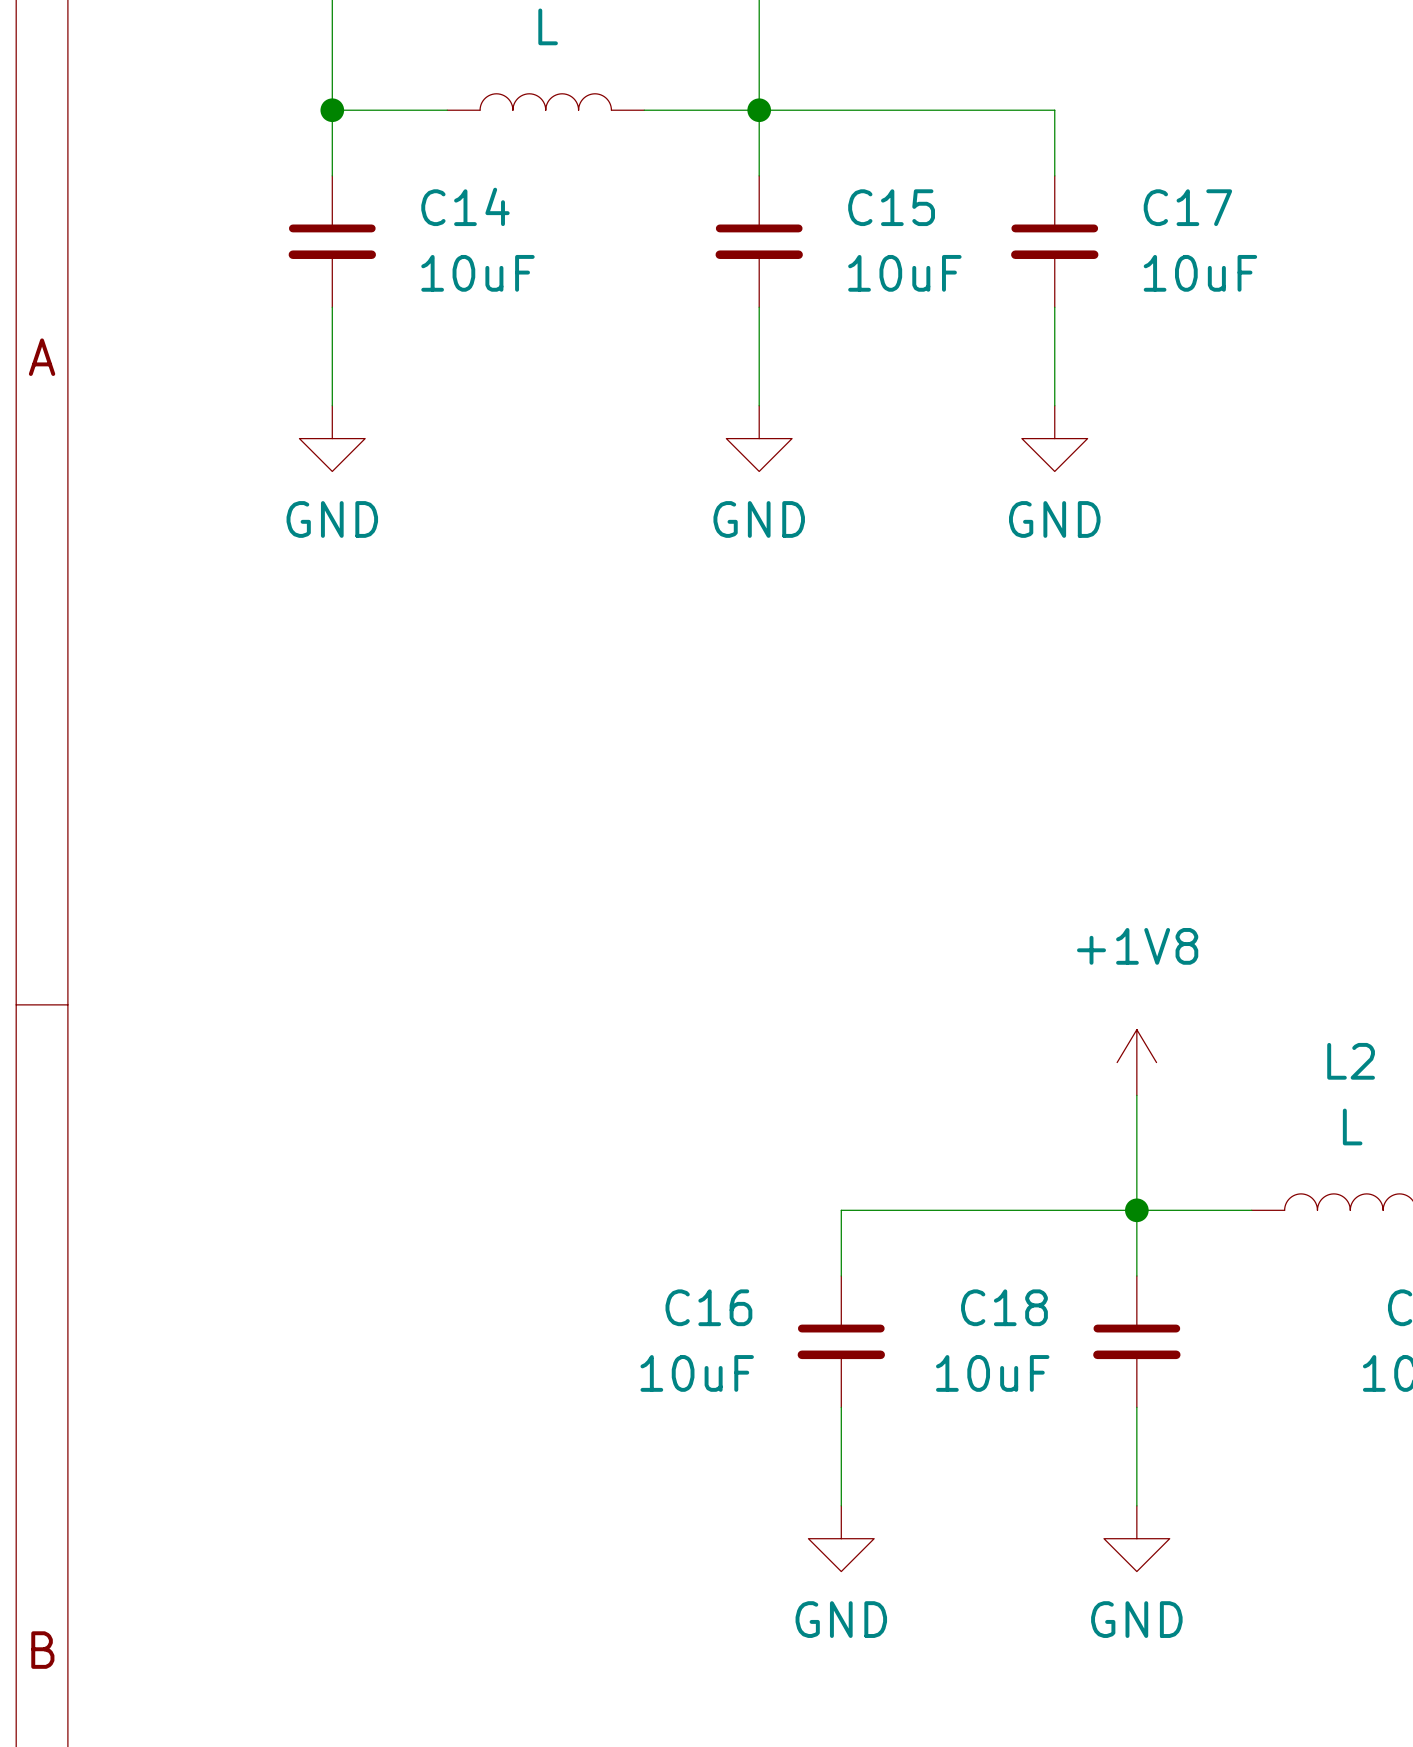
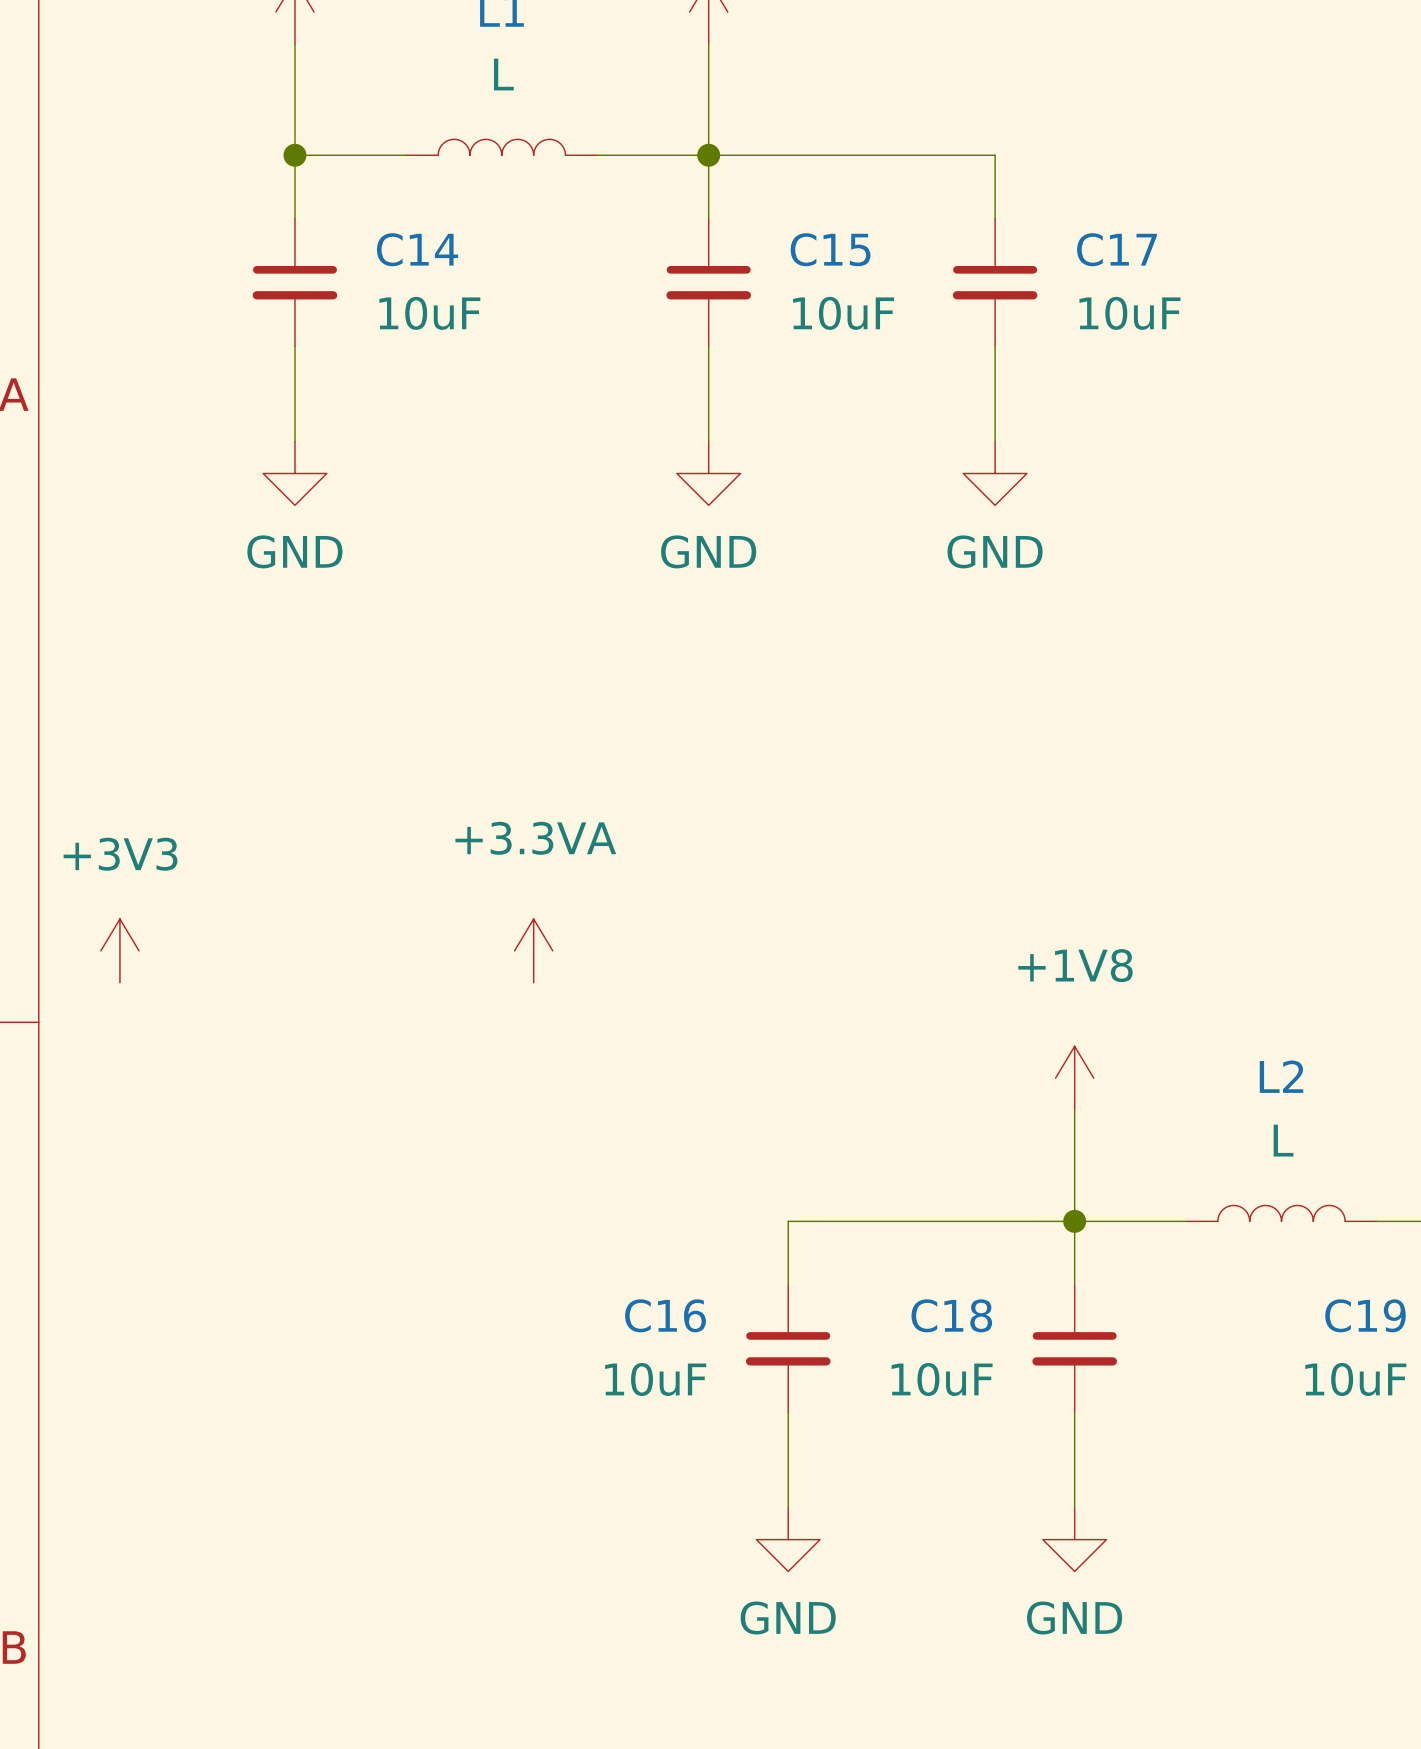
power symbol: none -> +3V3 (119, 950)
power symbol: none -> +3.3VA (533, 950)

